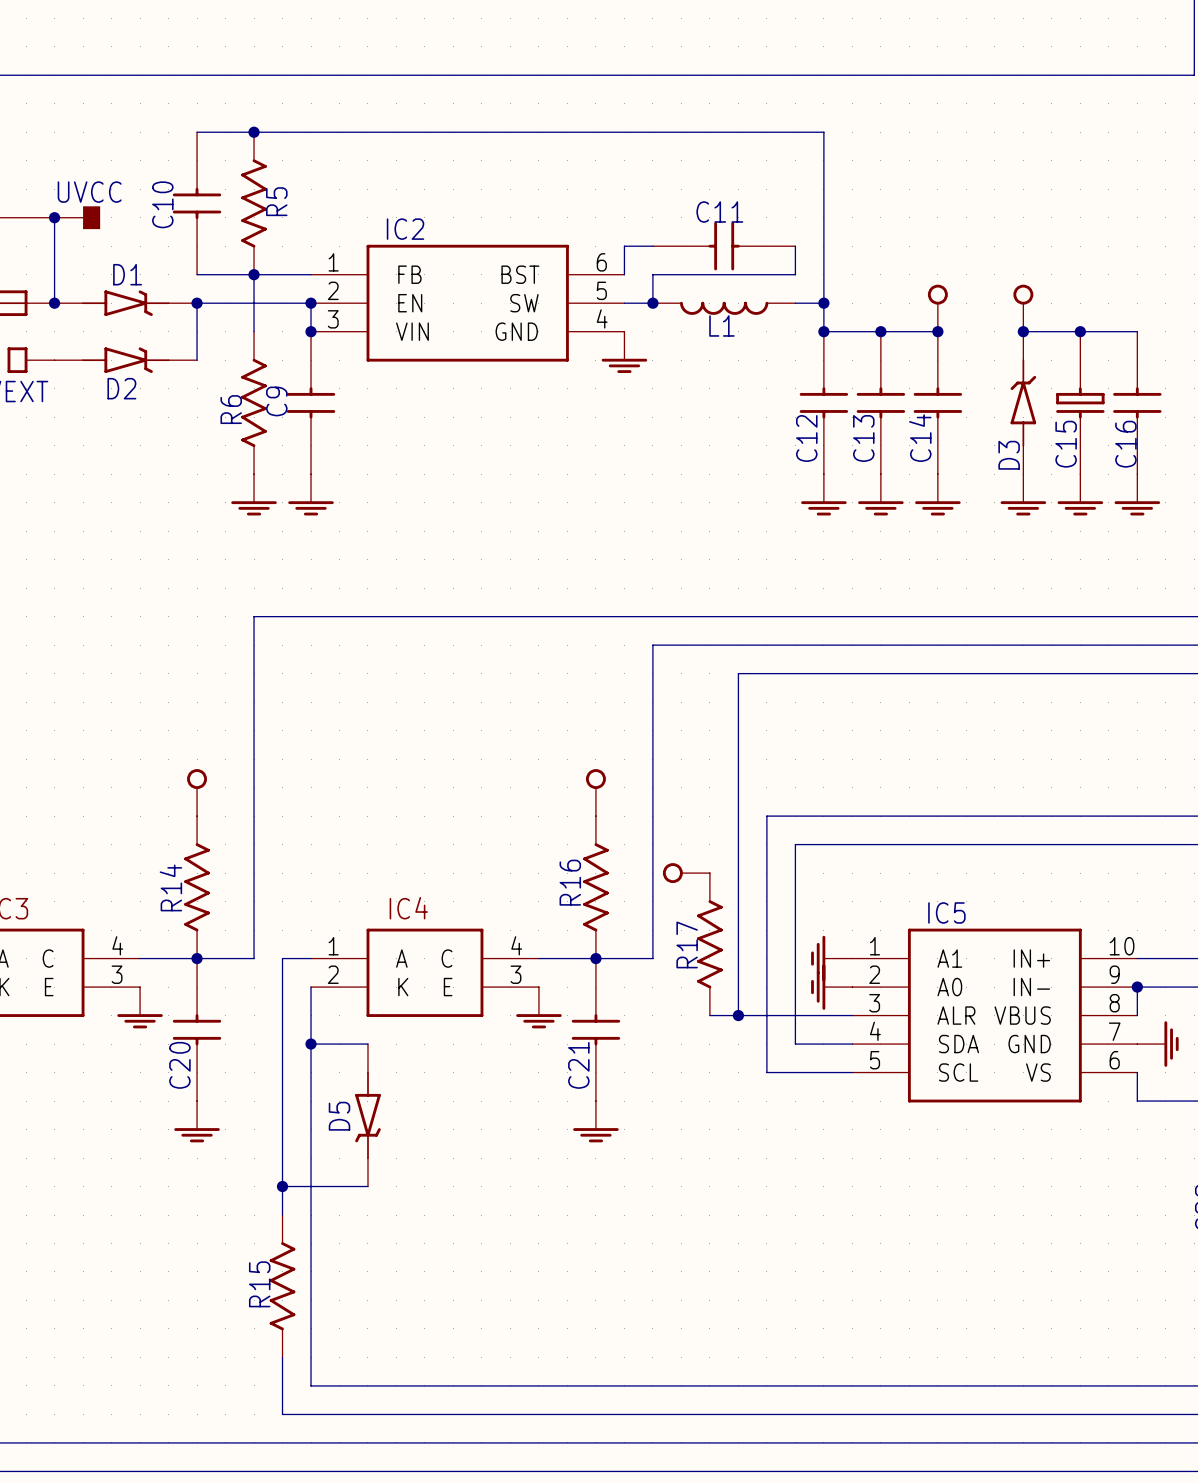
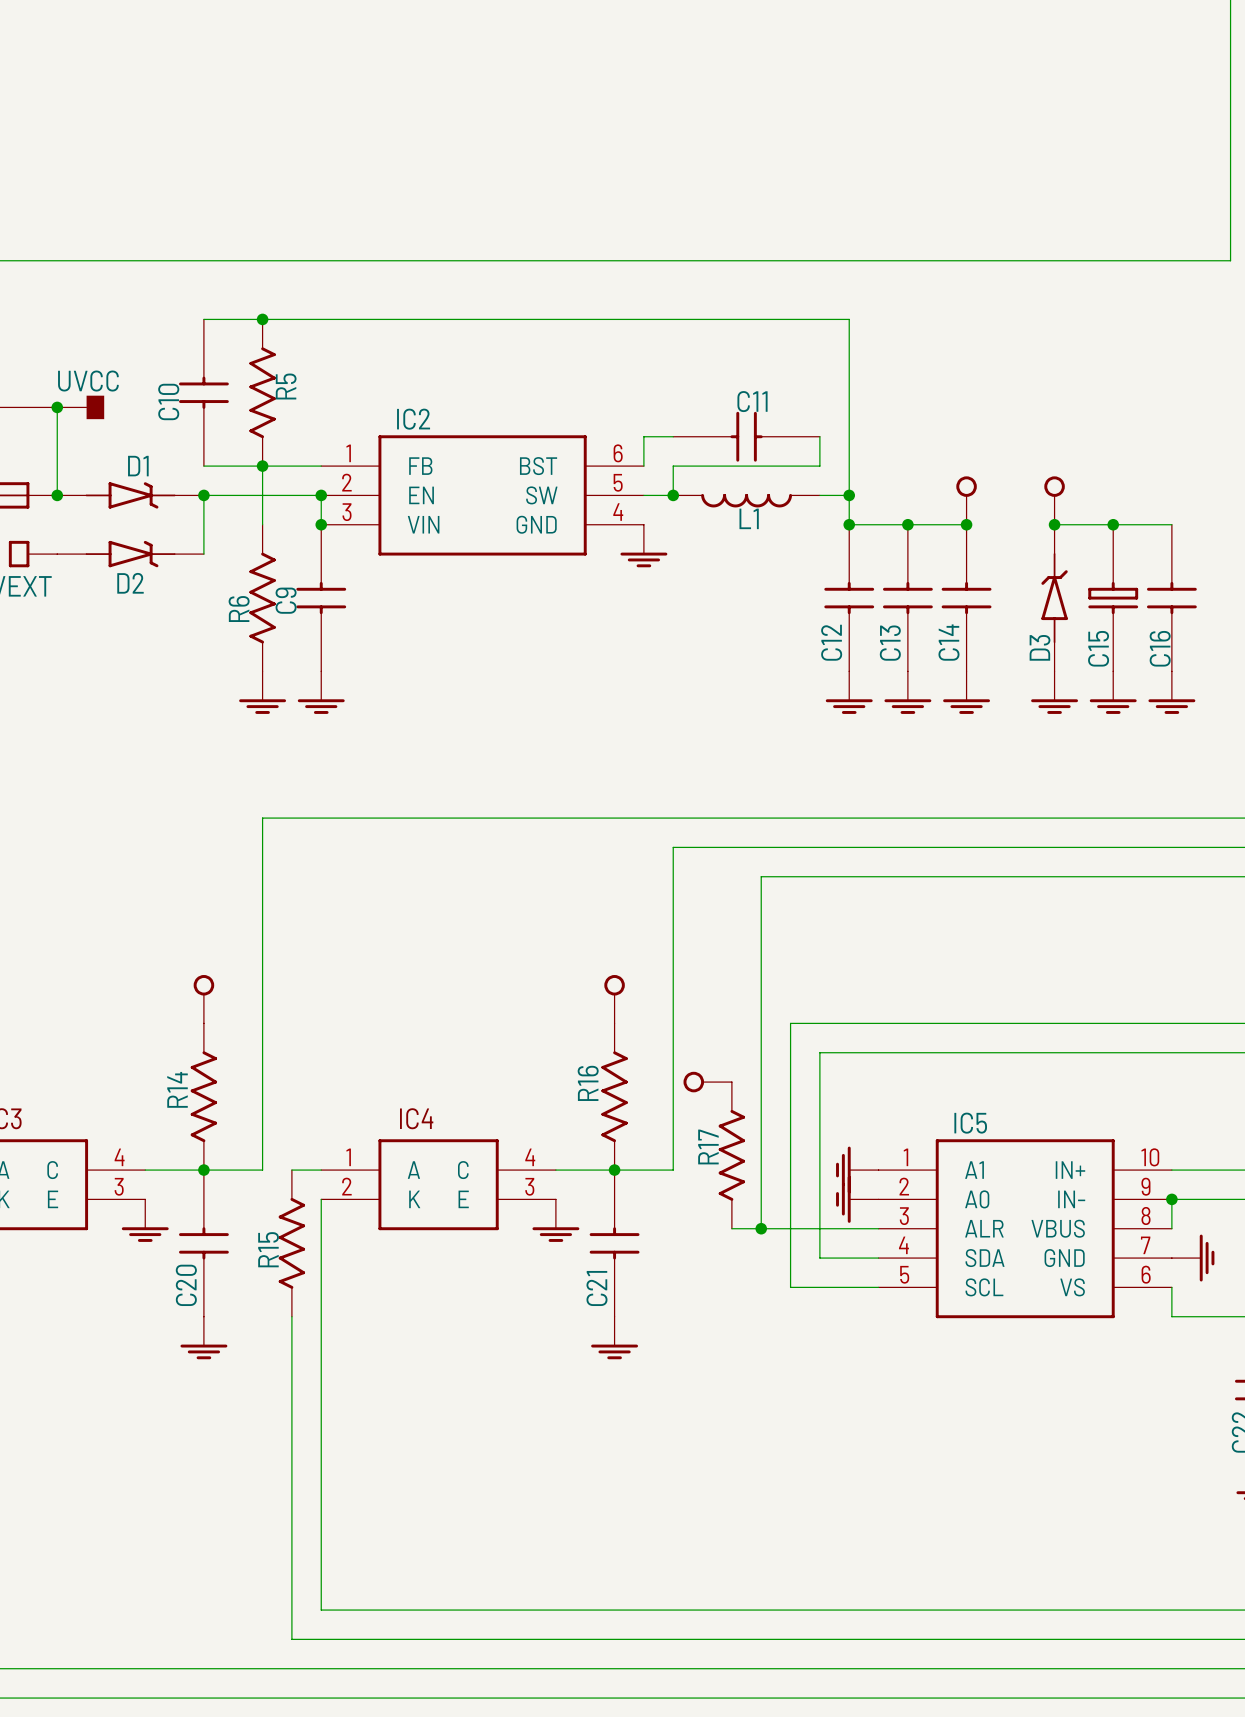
wire: (311, 1044) (367, 1044) -> none
junction: (311, 1044) -> none
D5: (367, 1115) -> none
wire: (282, 1186) (367, 1186) -> none
junction: (282, 1186) -> none
R15 position: (282, 1286) -> (291, 1243)

